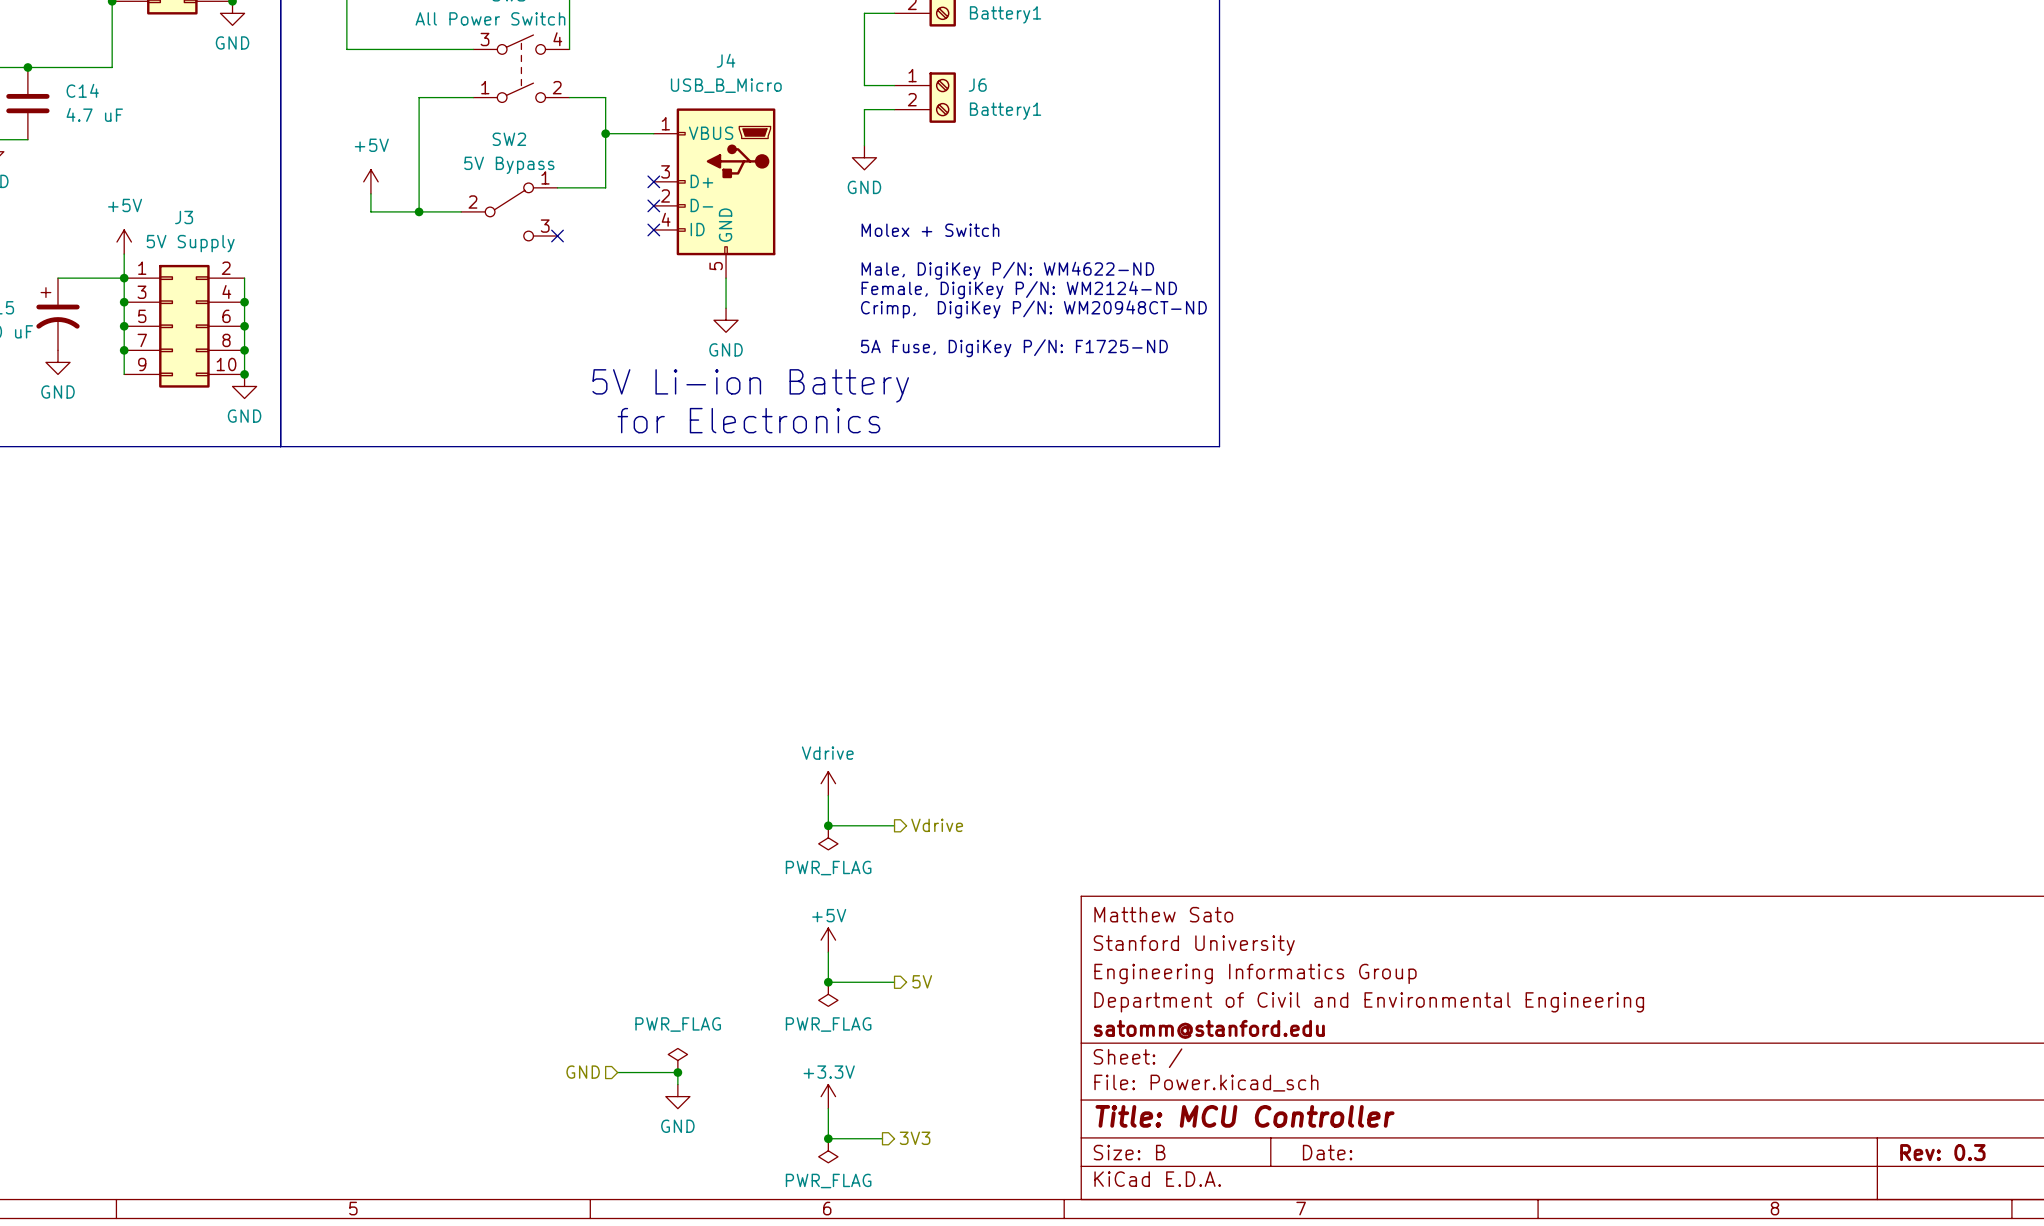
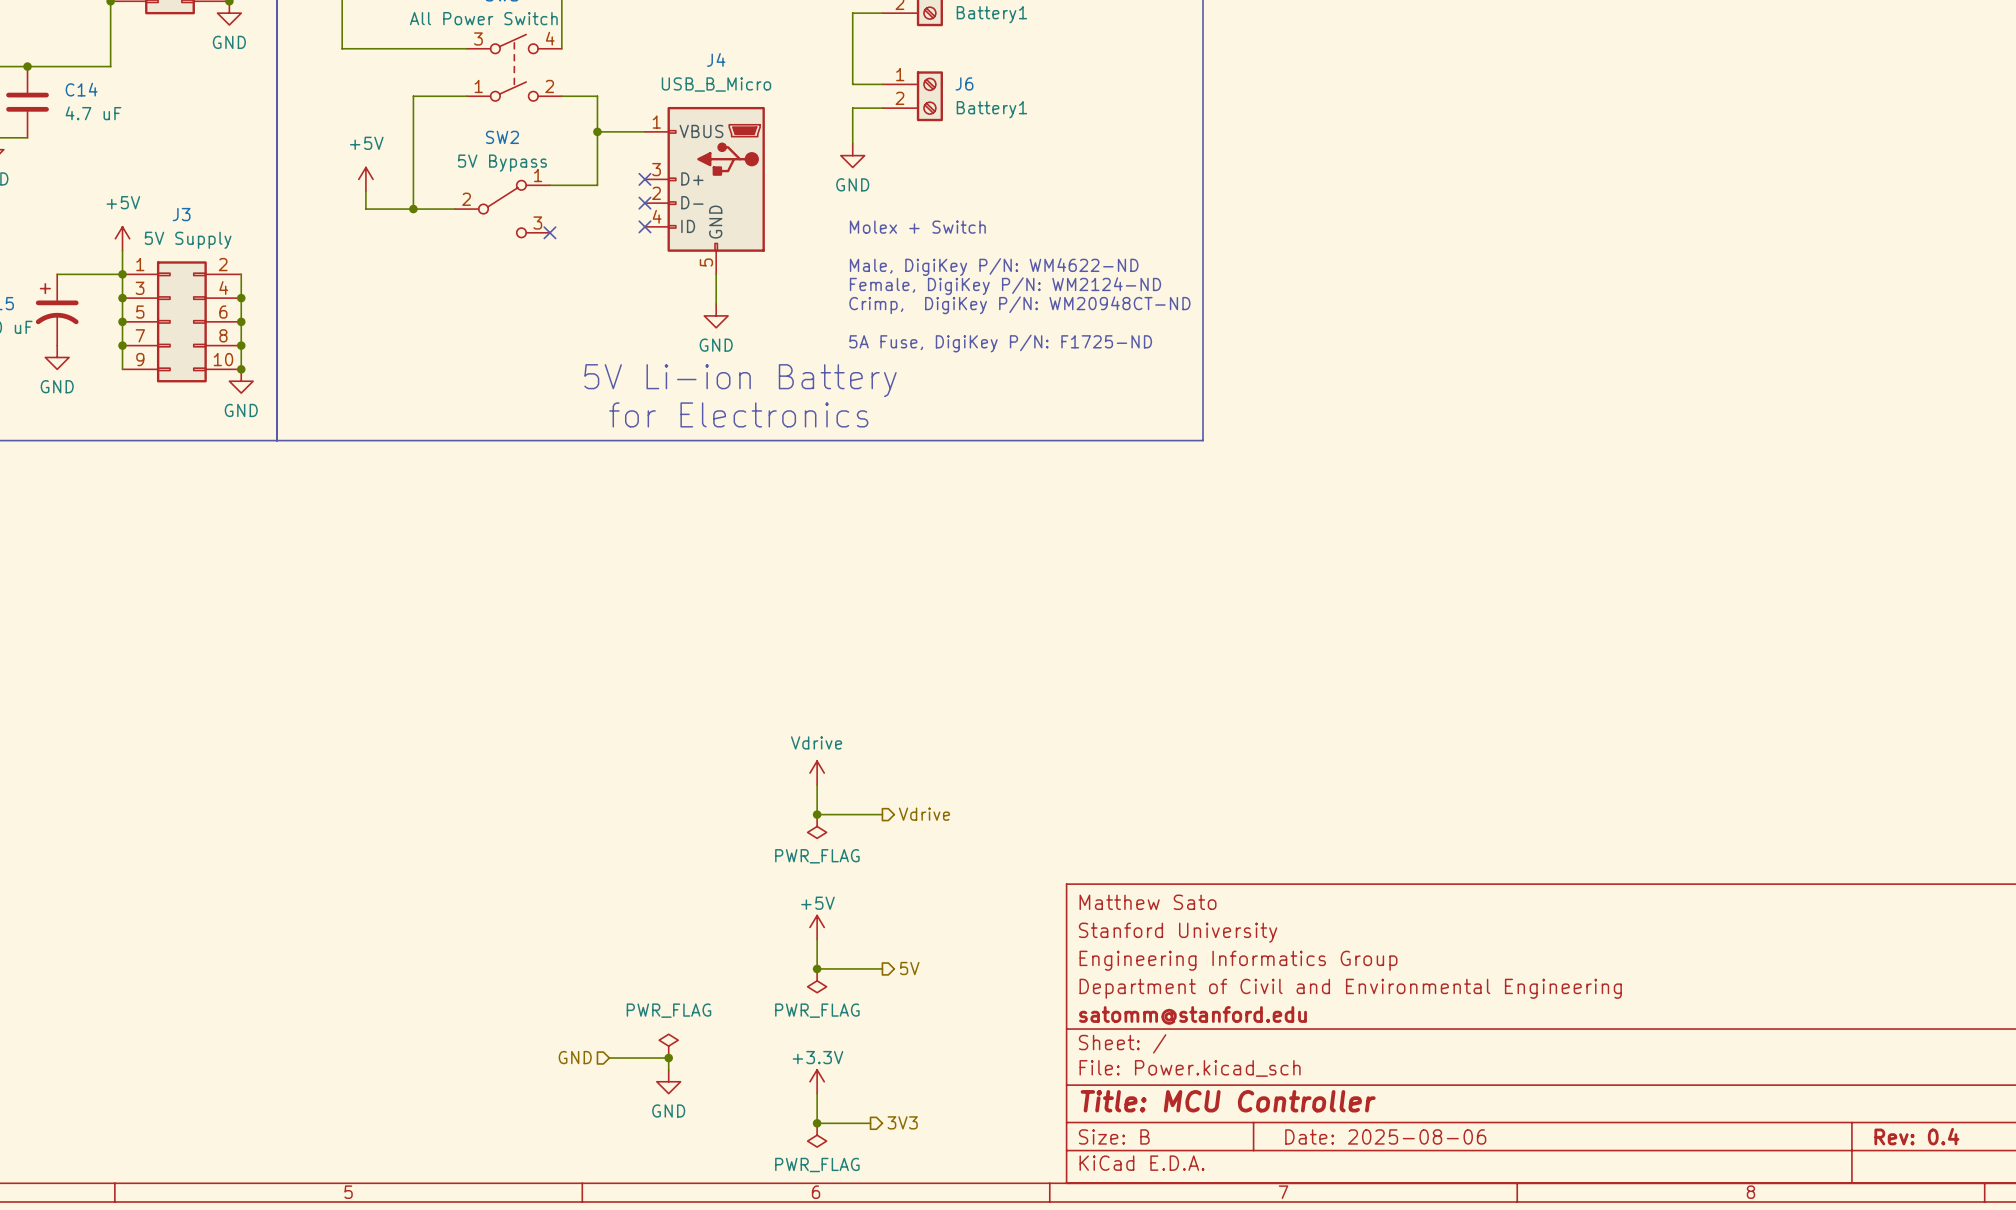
title block: Date: (1327, 1152) -> Date: 2025-08-06 (1385, 1136)
title block: Rev: 0.3 (1942, 1152) -> Rev: 0.4 (1916, 1136)

